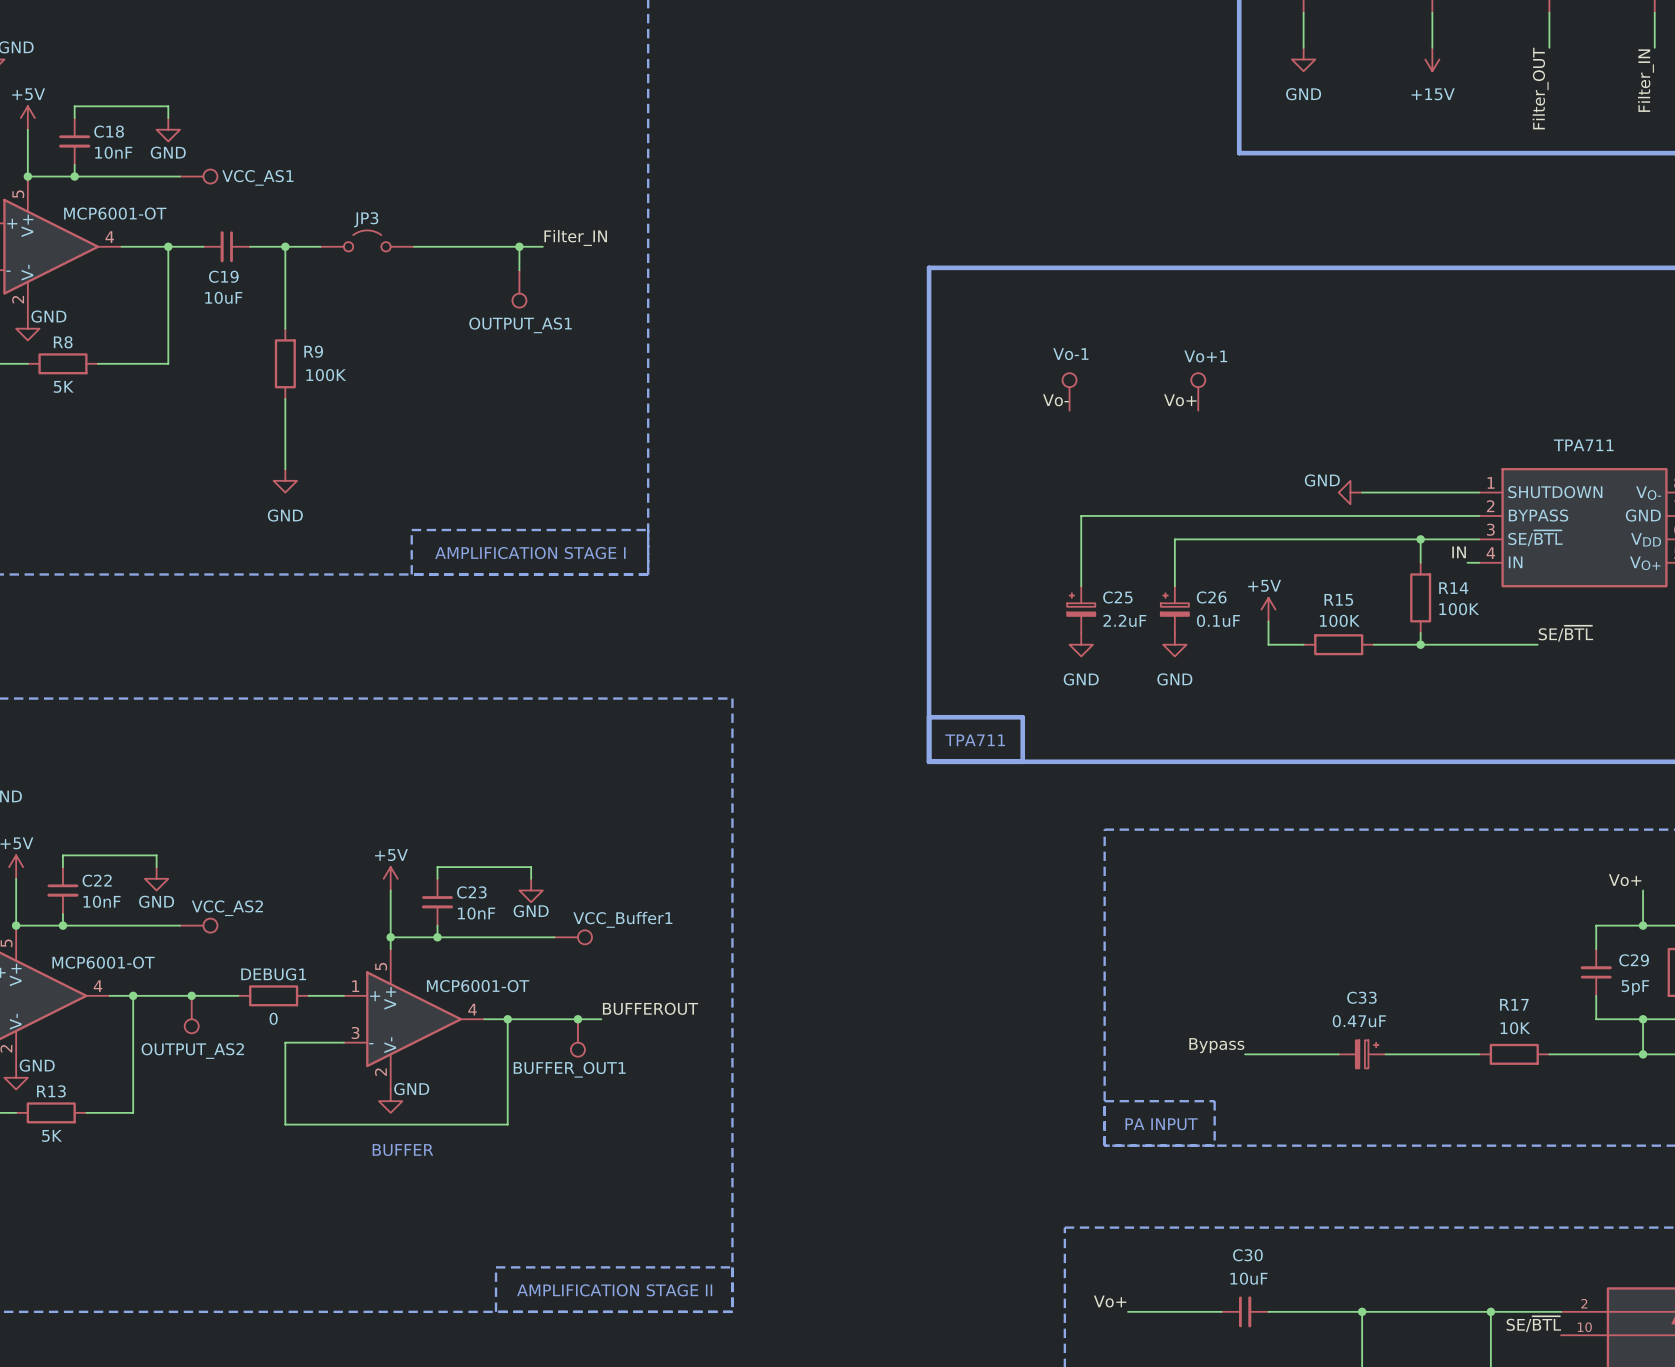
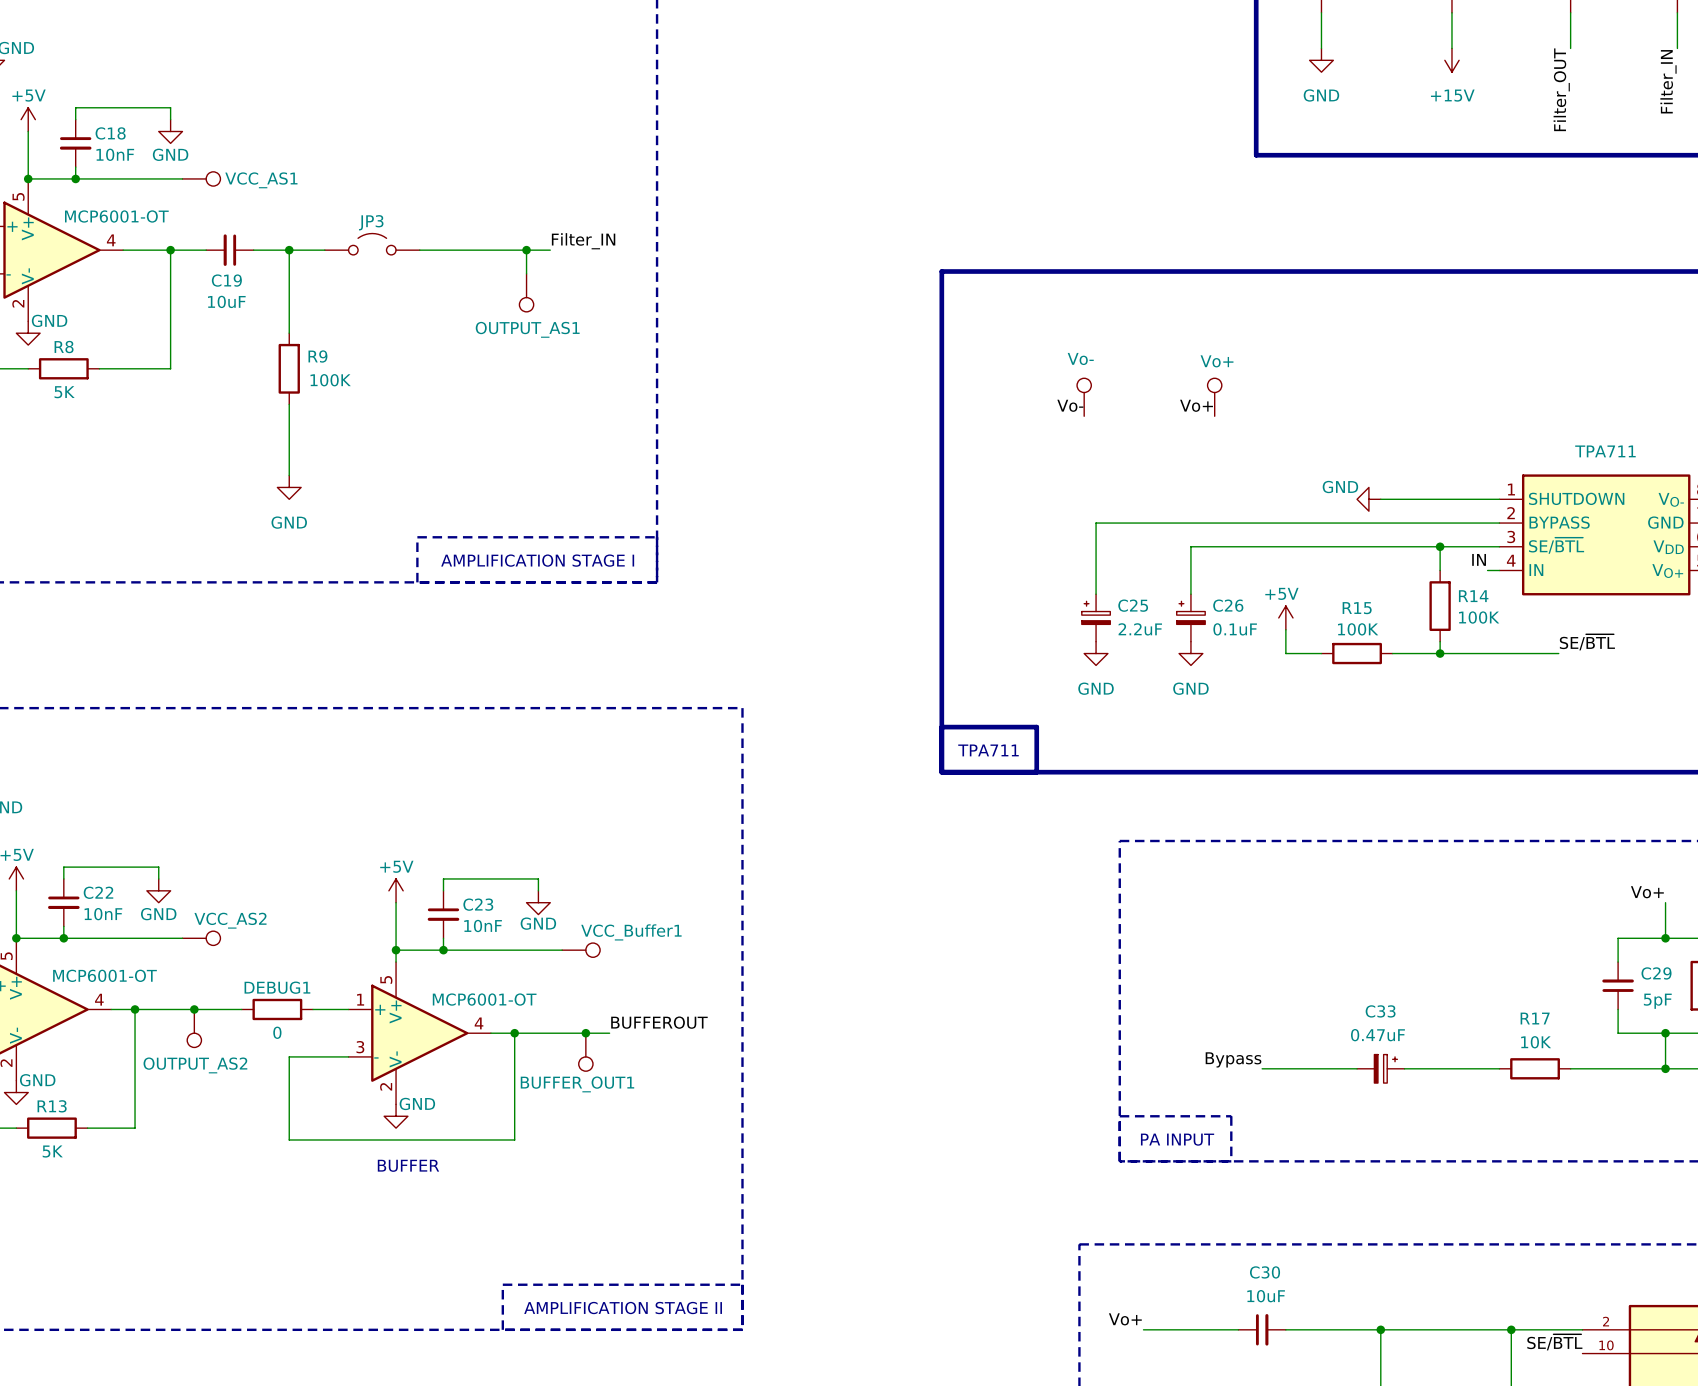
Vo-1 name: Vo-1 (1070, 354) -> Vo- (1080, 358)
Vo+1 name: Vo+1 (1205, 356) -> Vo+ (1217, 361)

